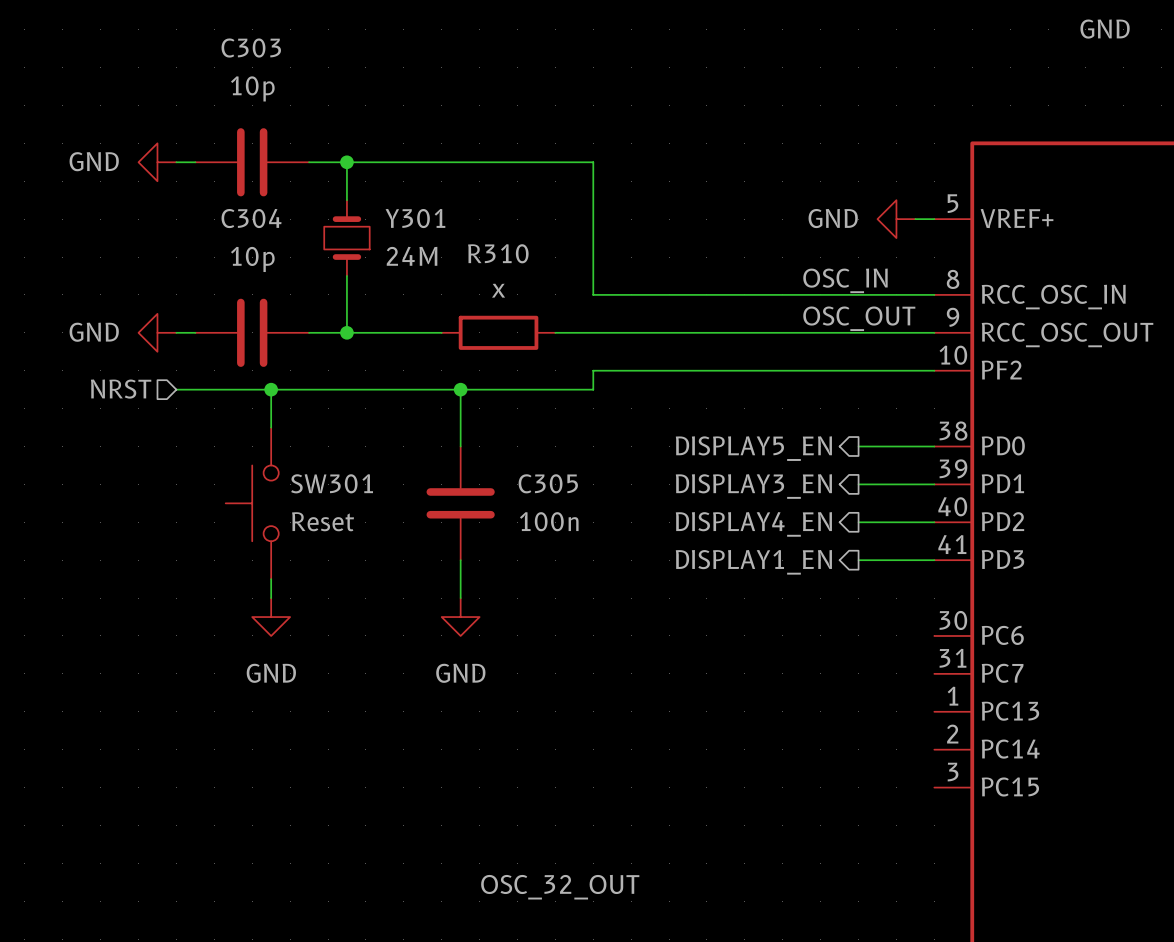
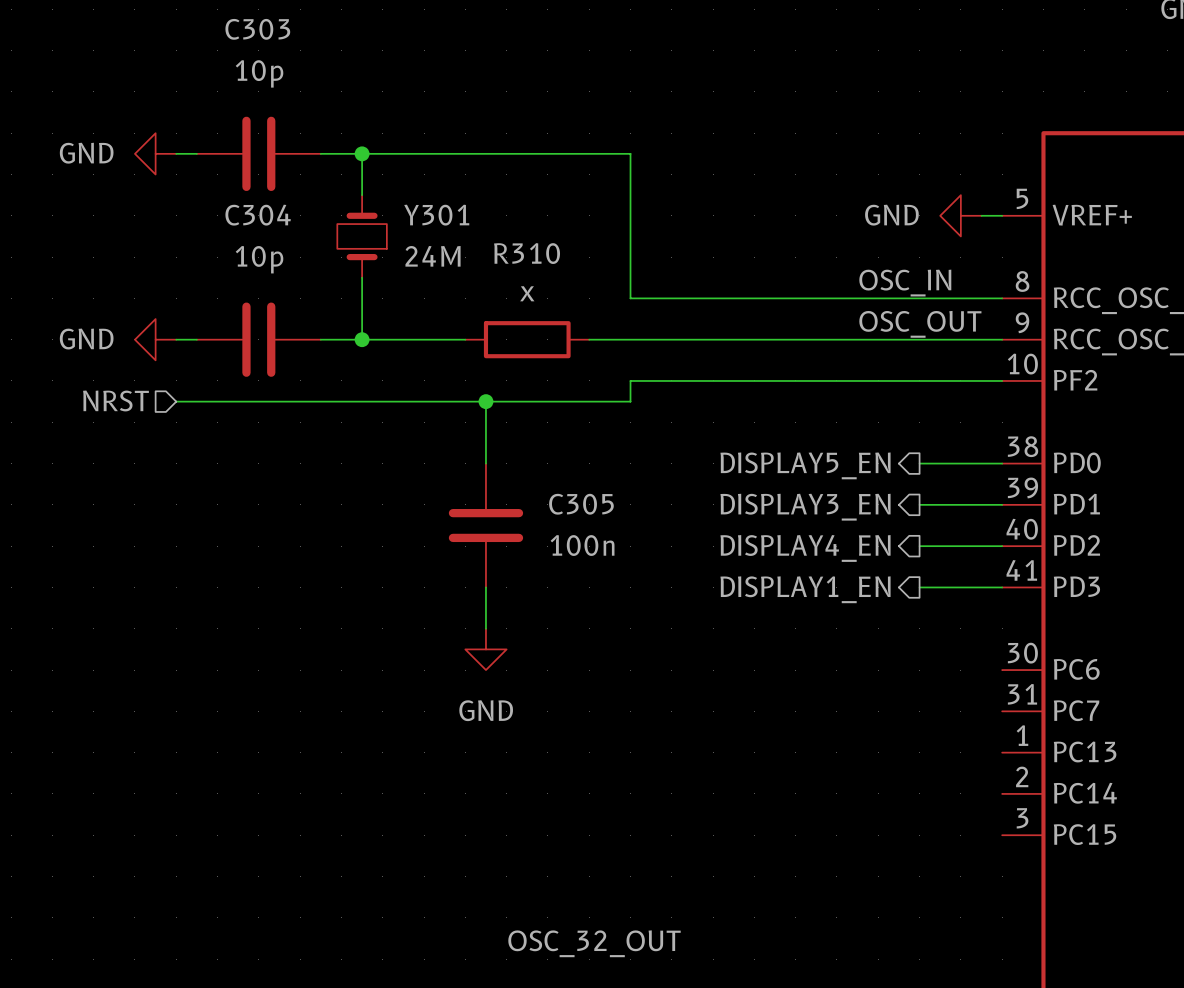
wire: (271, 389) (271, 427) -> none
junction: (271, 389) -> none
SW301: Reset (252, 503) -> none
wire: (271, 579) (271, 598) -> none
power symbol: GND (271, 617) -> none

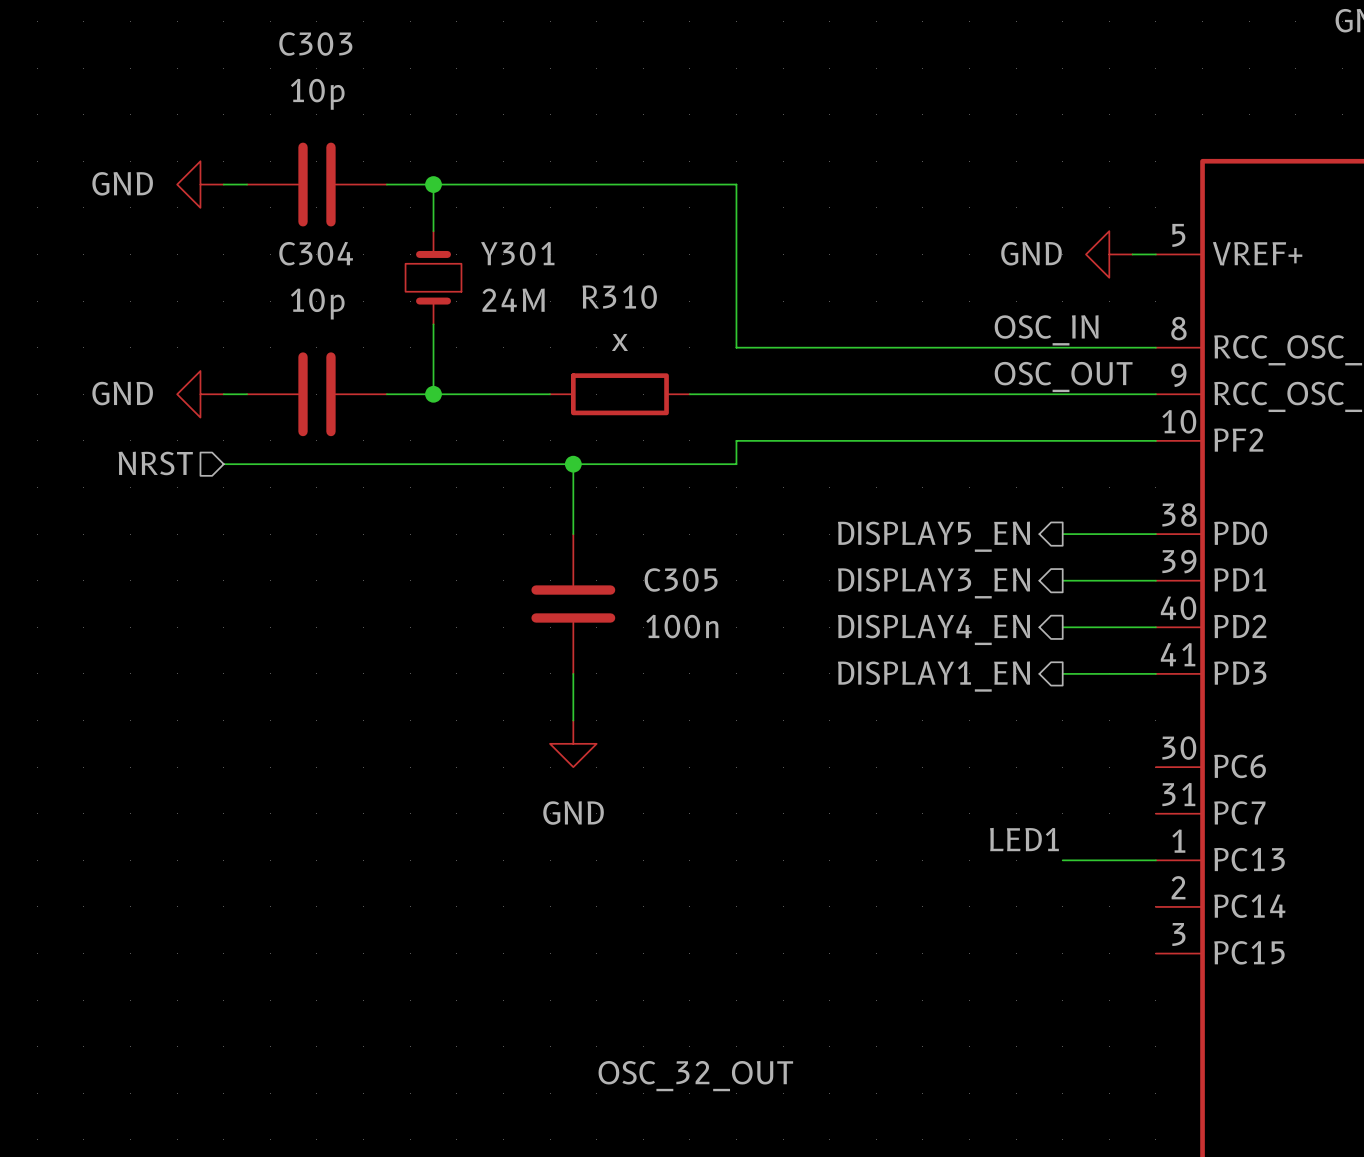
label: none -> LED1 (1024, 839)
wire: none -> (1062, 860) (1155, 860)

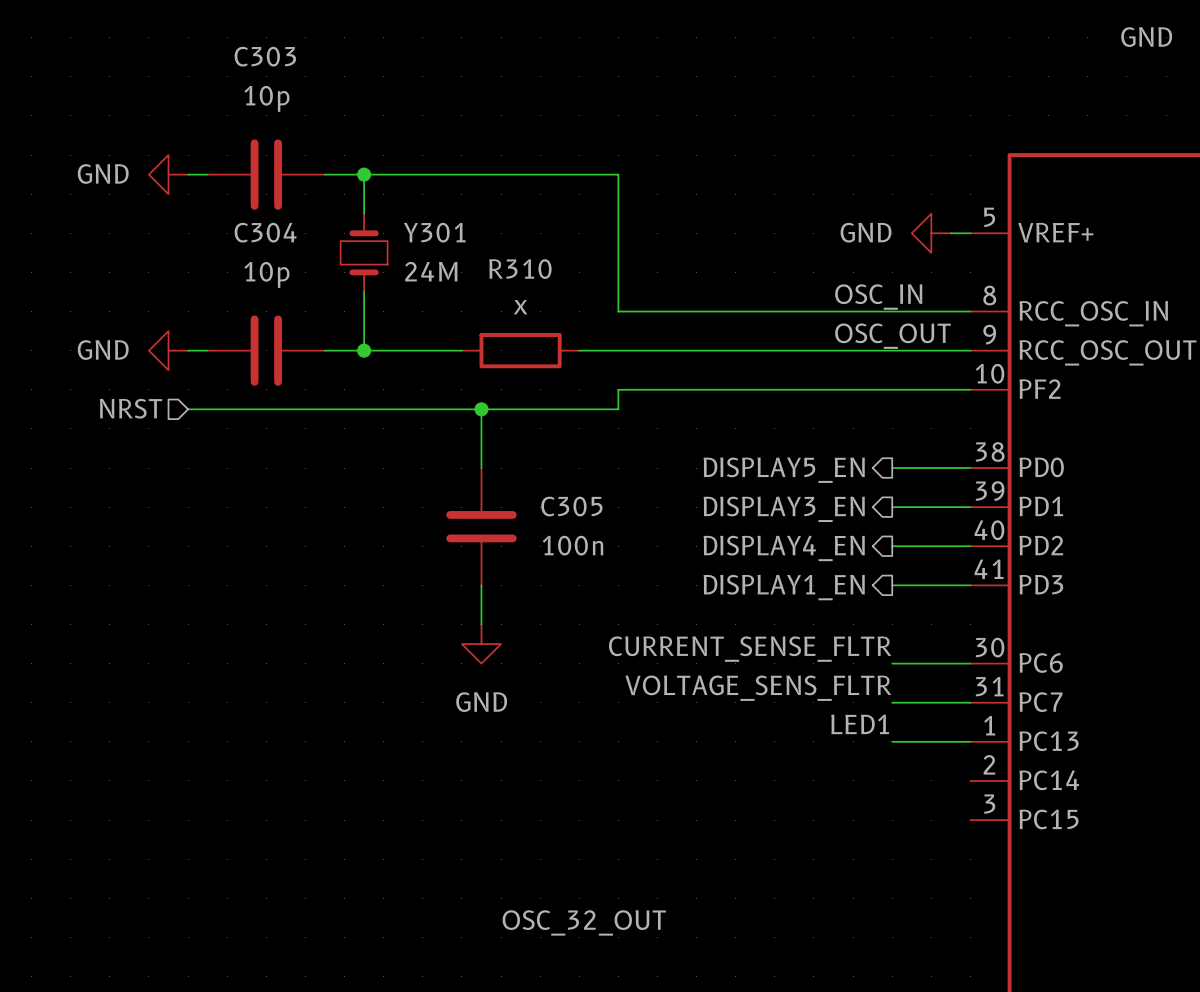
label: none -> CURRENT_SENSE_FLTR (750, 649)
wire: none -> (892, 663) (970, 663)
label: none -> VOLTAGE_SENS_FLTR (758, 688)
wire: none -> (892, 702) (970, 702)

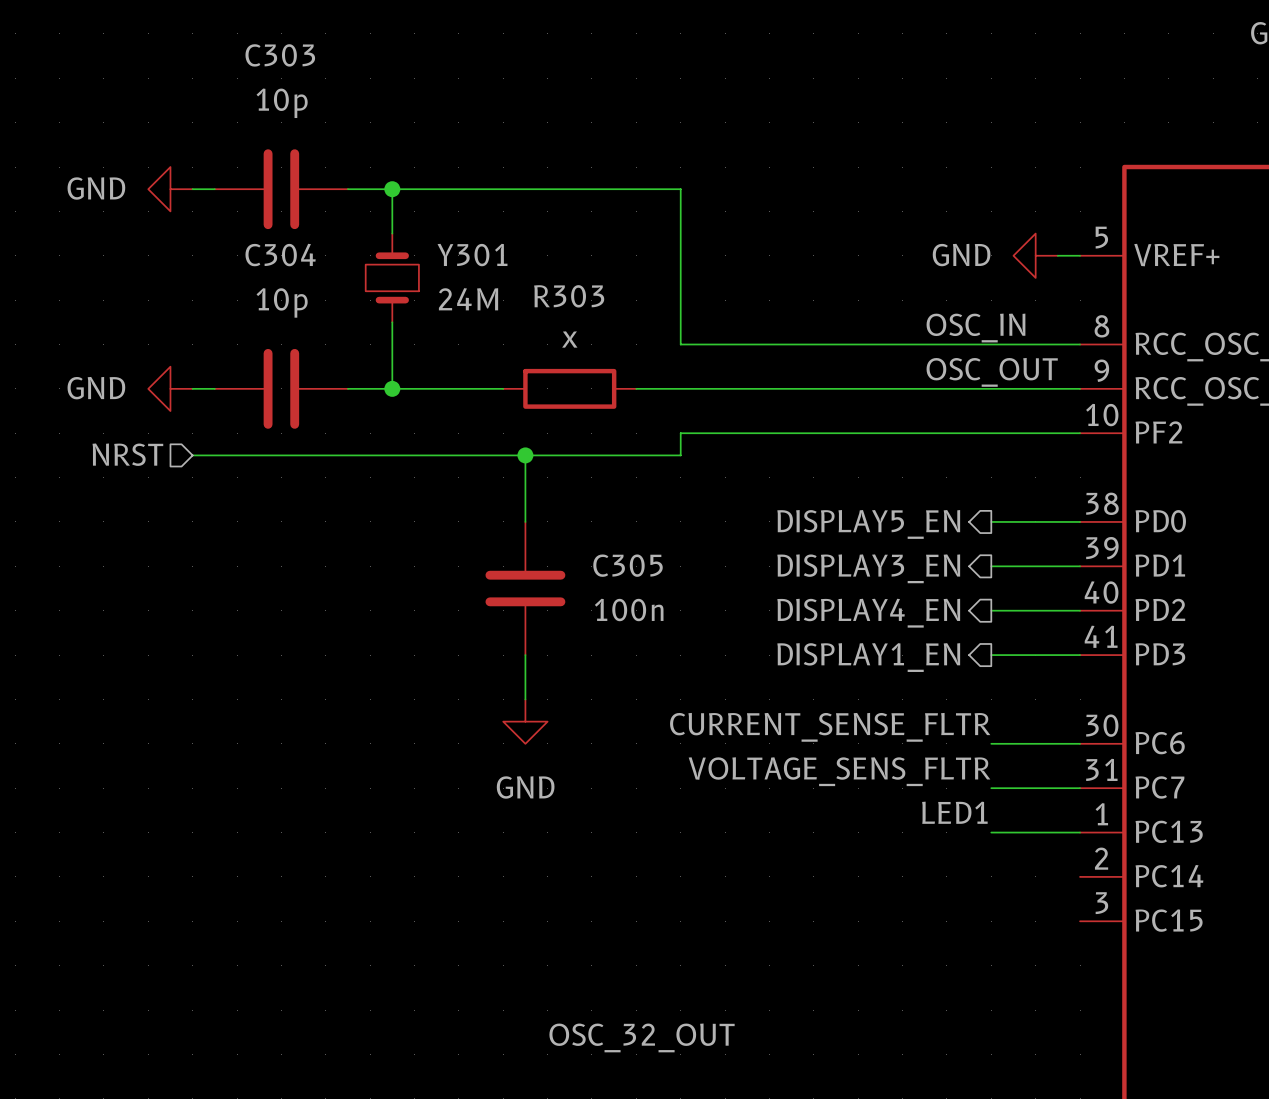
R310 name: R310 (520, 269) -> R303 (569, 296)

